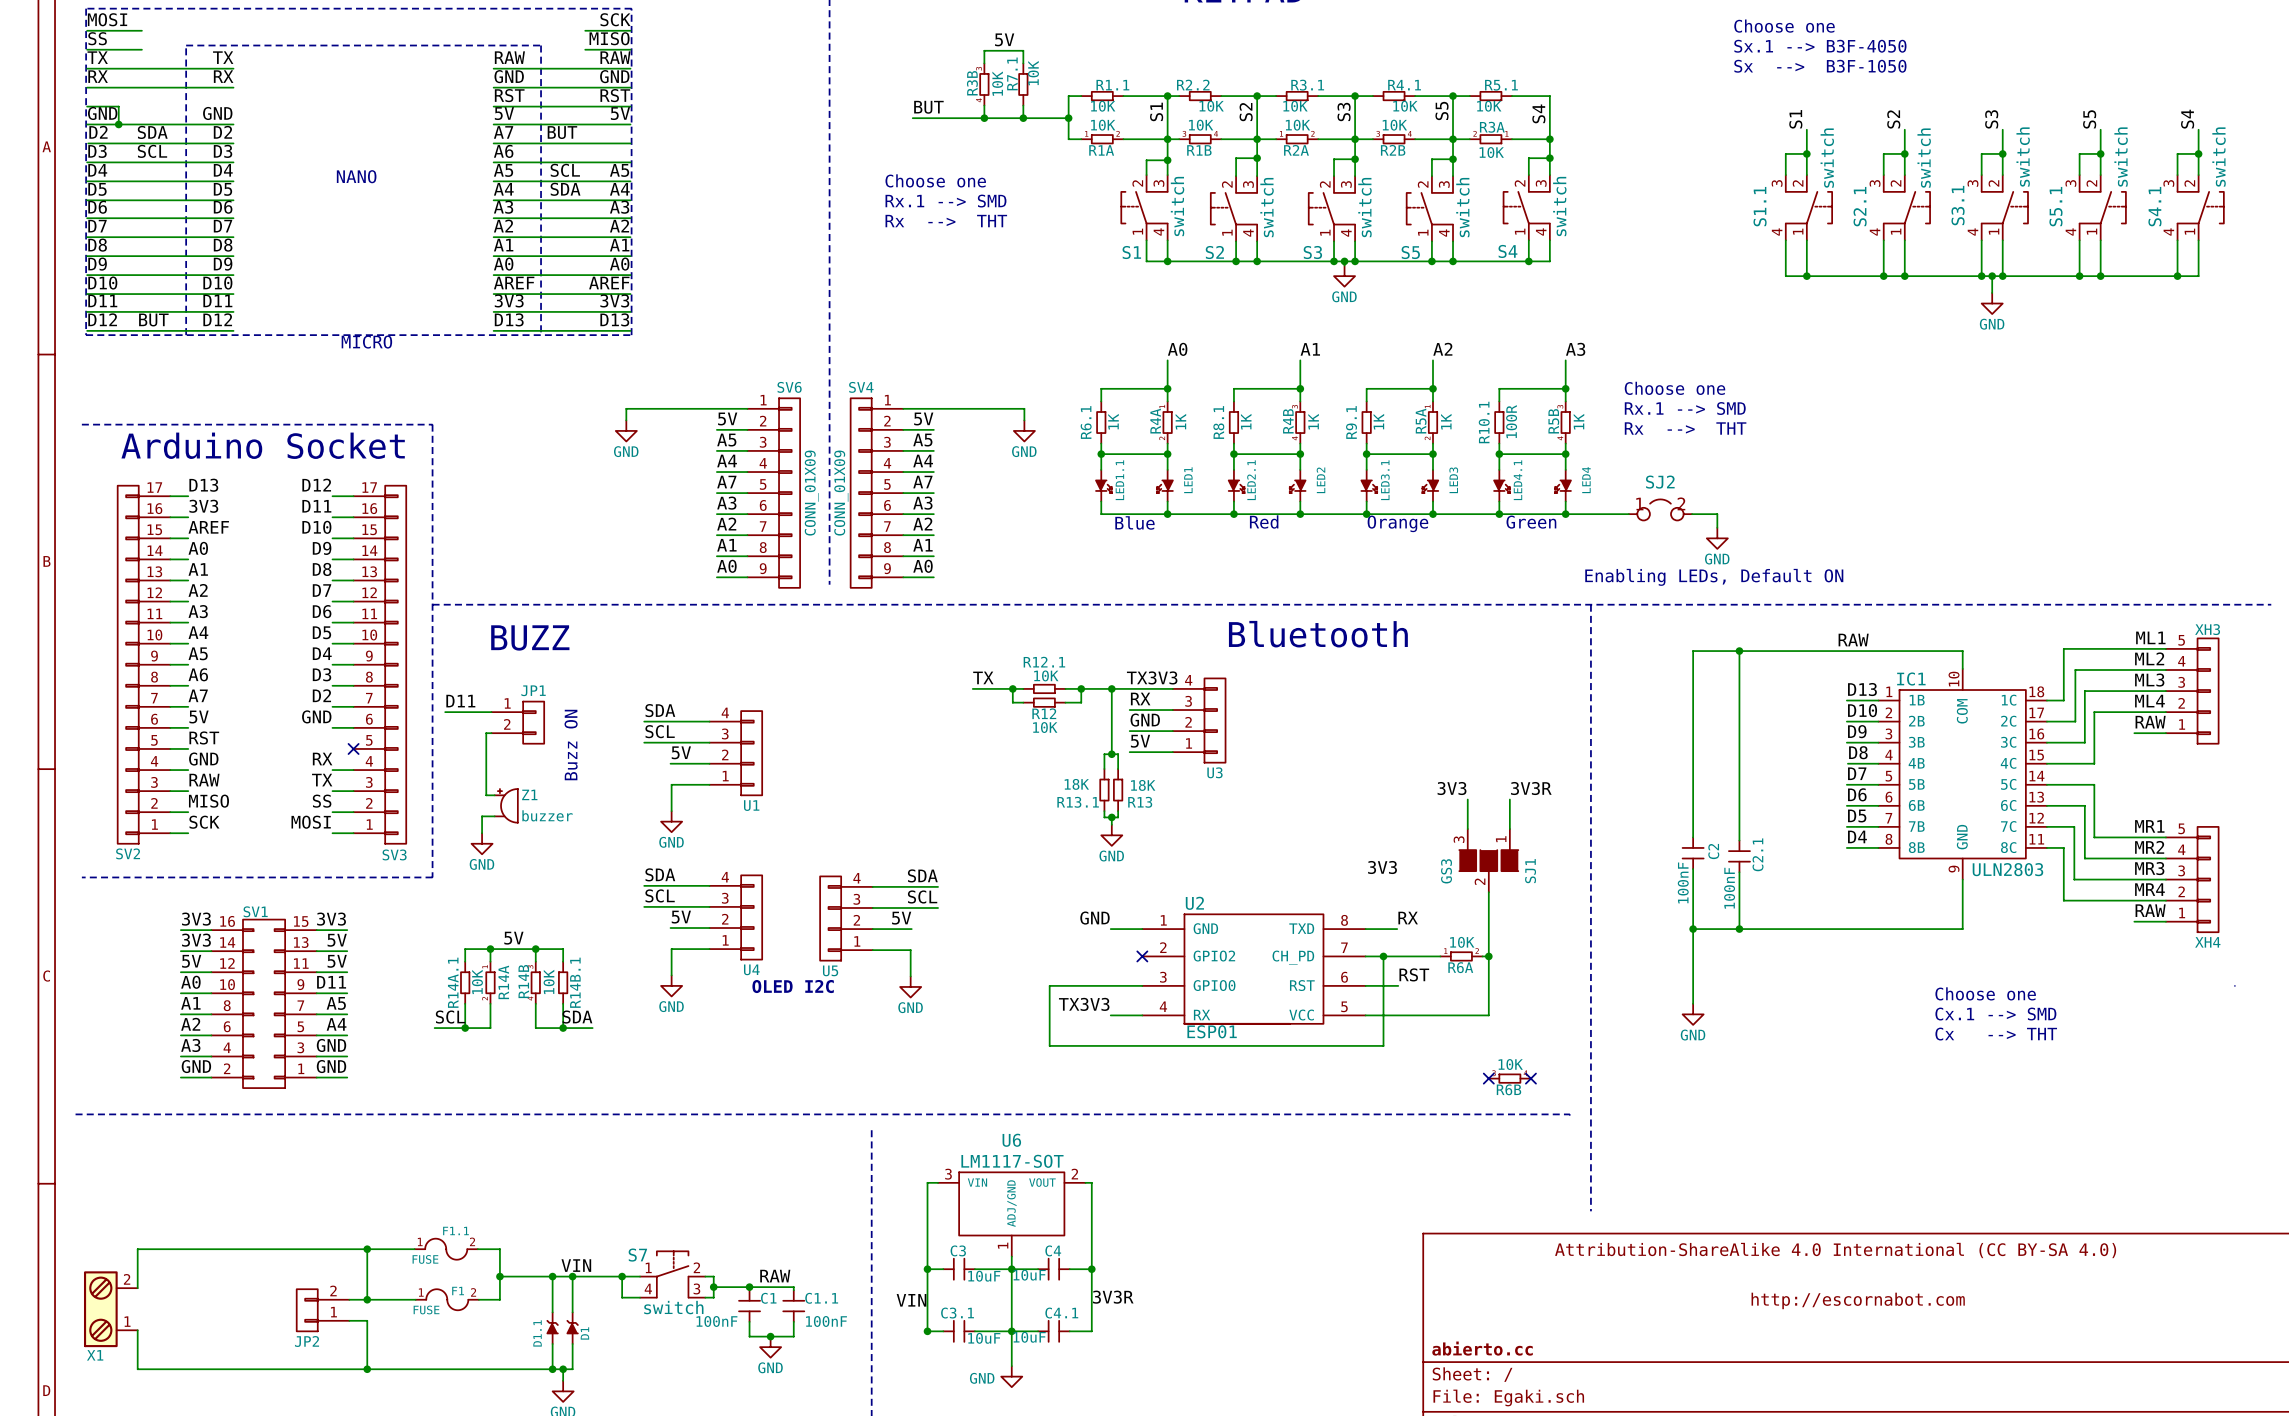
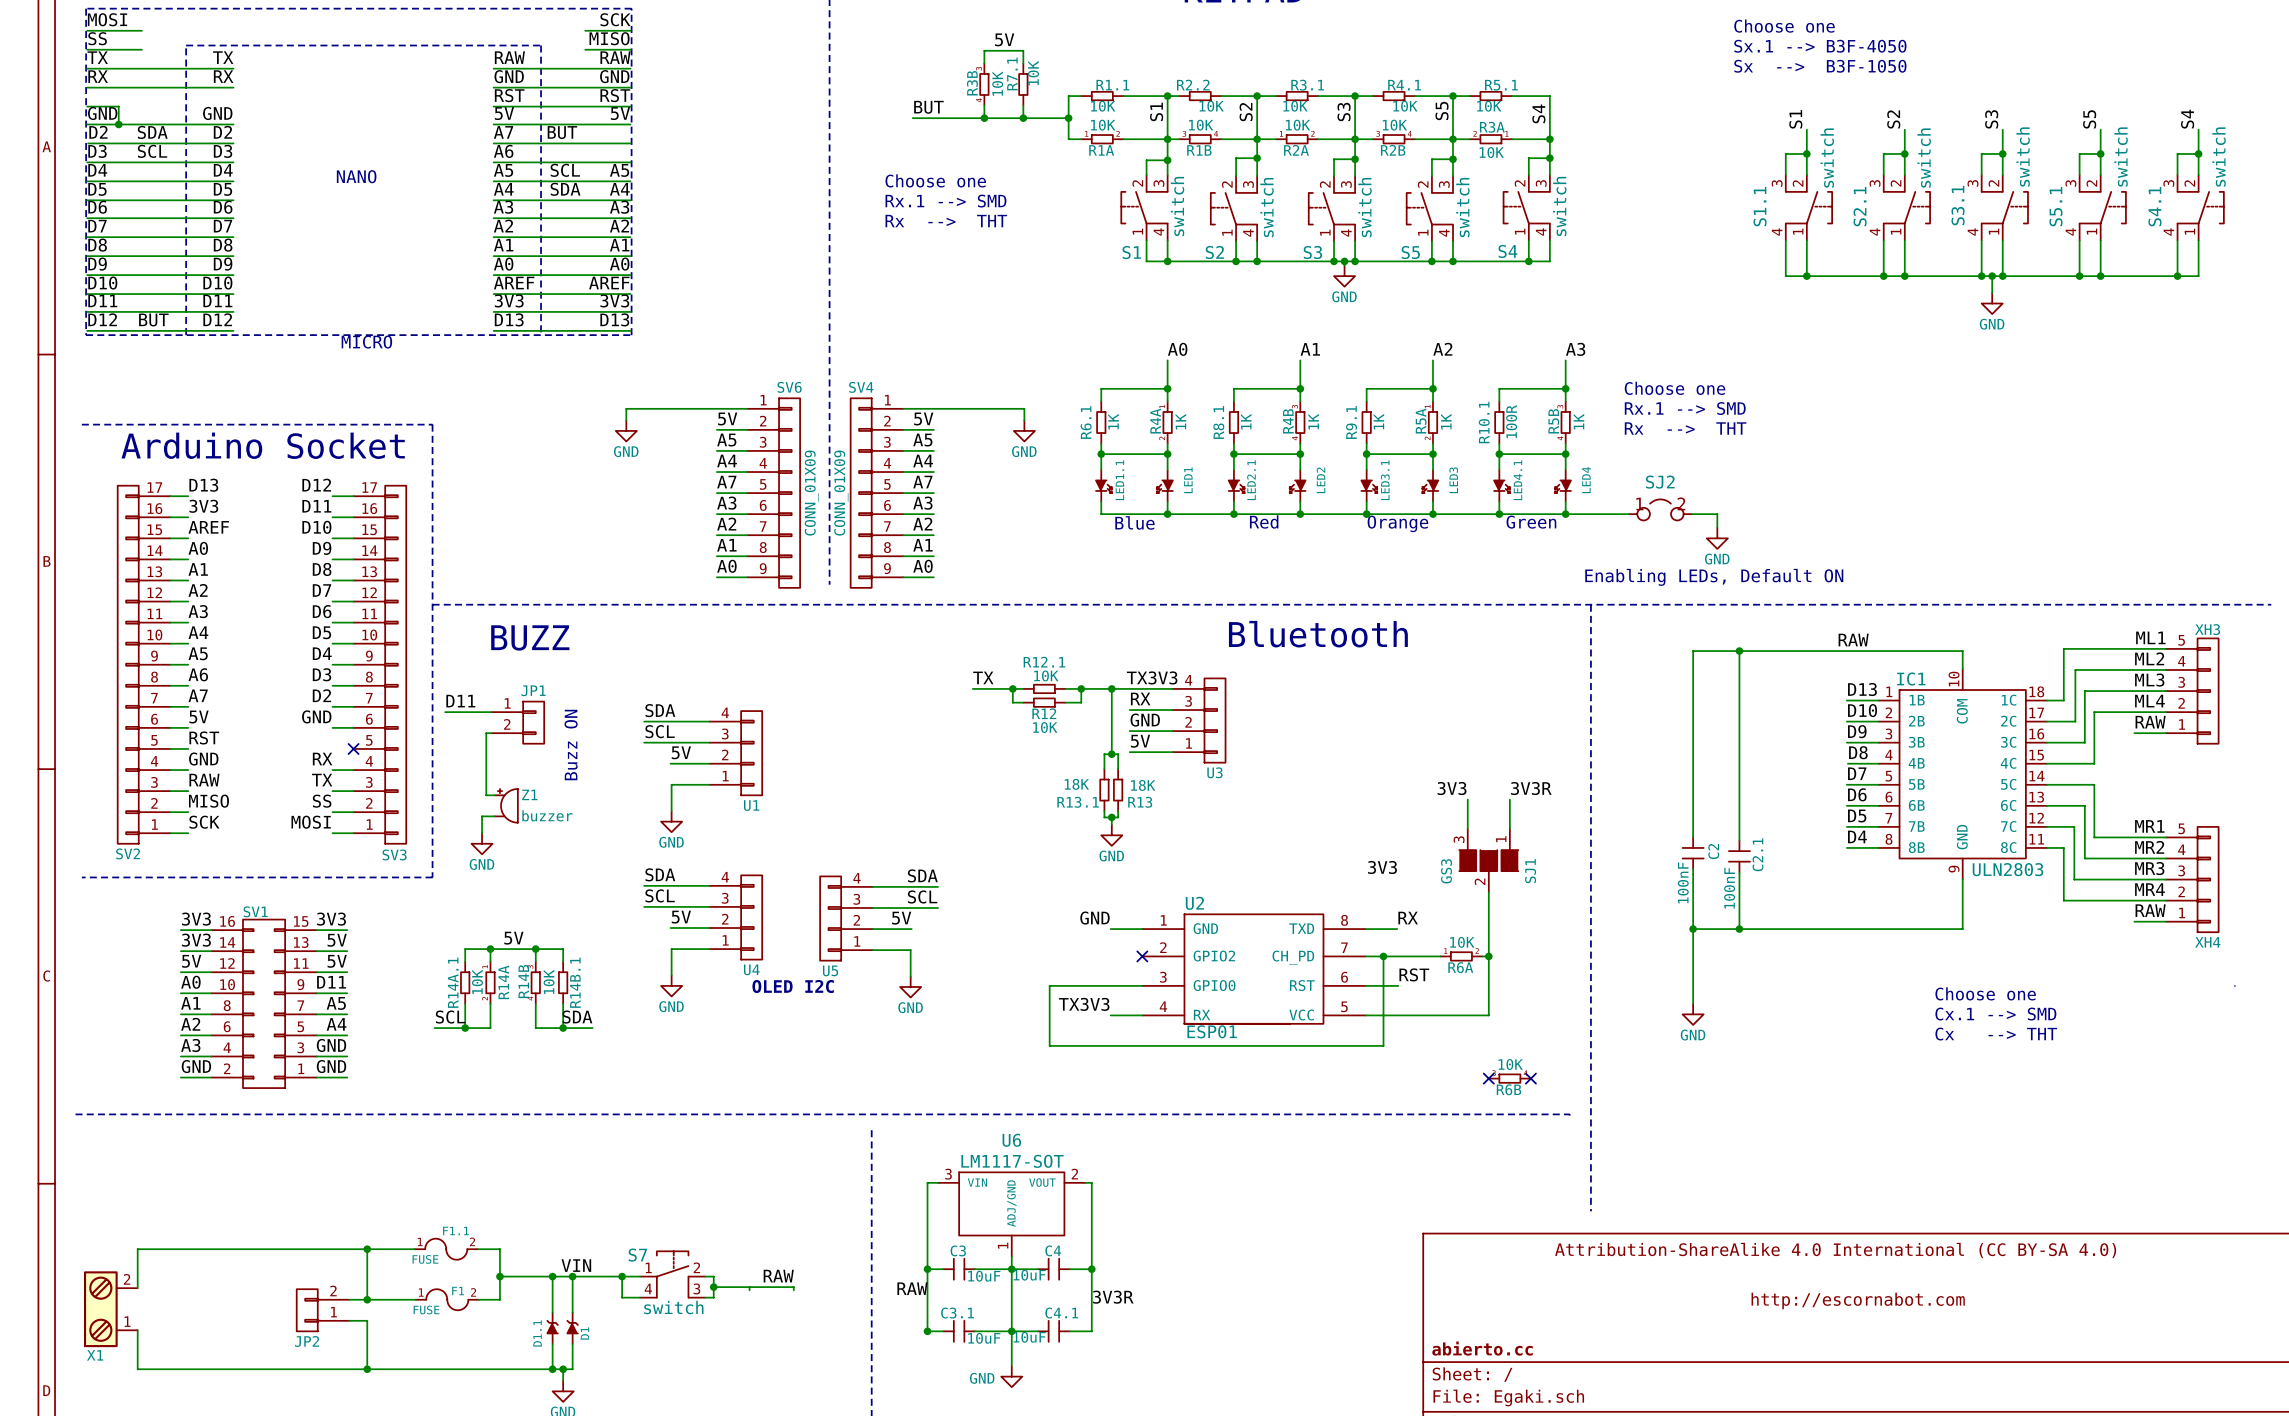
label position: RAW (775, 1276) -> RAW (778, 1276)
junction: (749, 1287) -> none
label: none -> RAW (912, 1288)
label: VIN (911, 1300) -> none
C1: 100nF (749, 1306) -> none
C1.1: 100nF (793, 1306) -> none
wire: (749, 1321) (749, 1336) (793, 1336) (793, 1321) -> none
junction: (770, 1336) -> none
power symbol: GND (770, 1347) -> none

